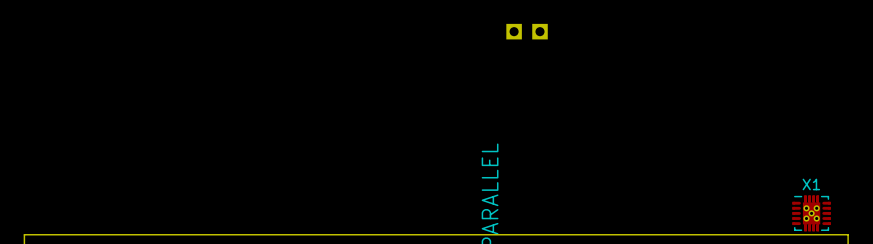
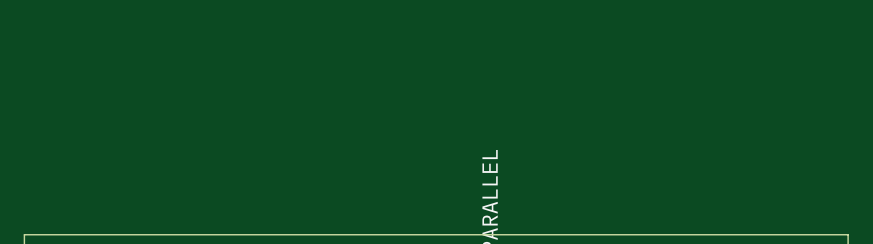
part: (527, 31) -> none
X1: (811, 213) -> none

